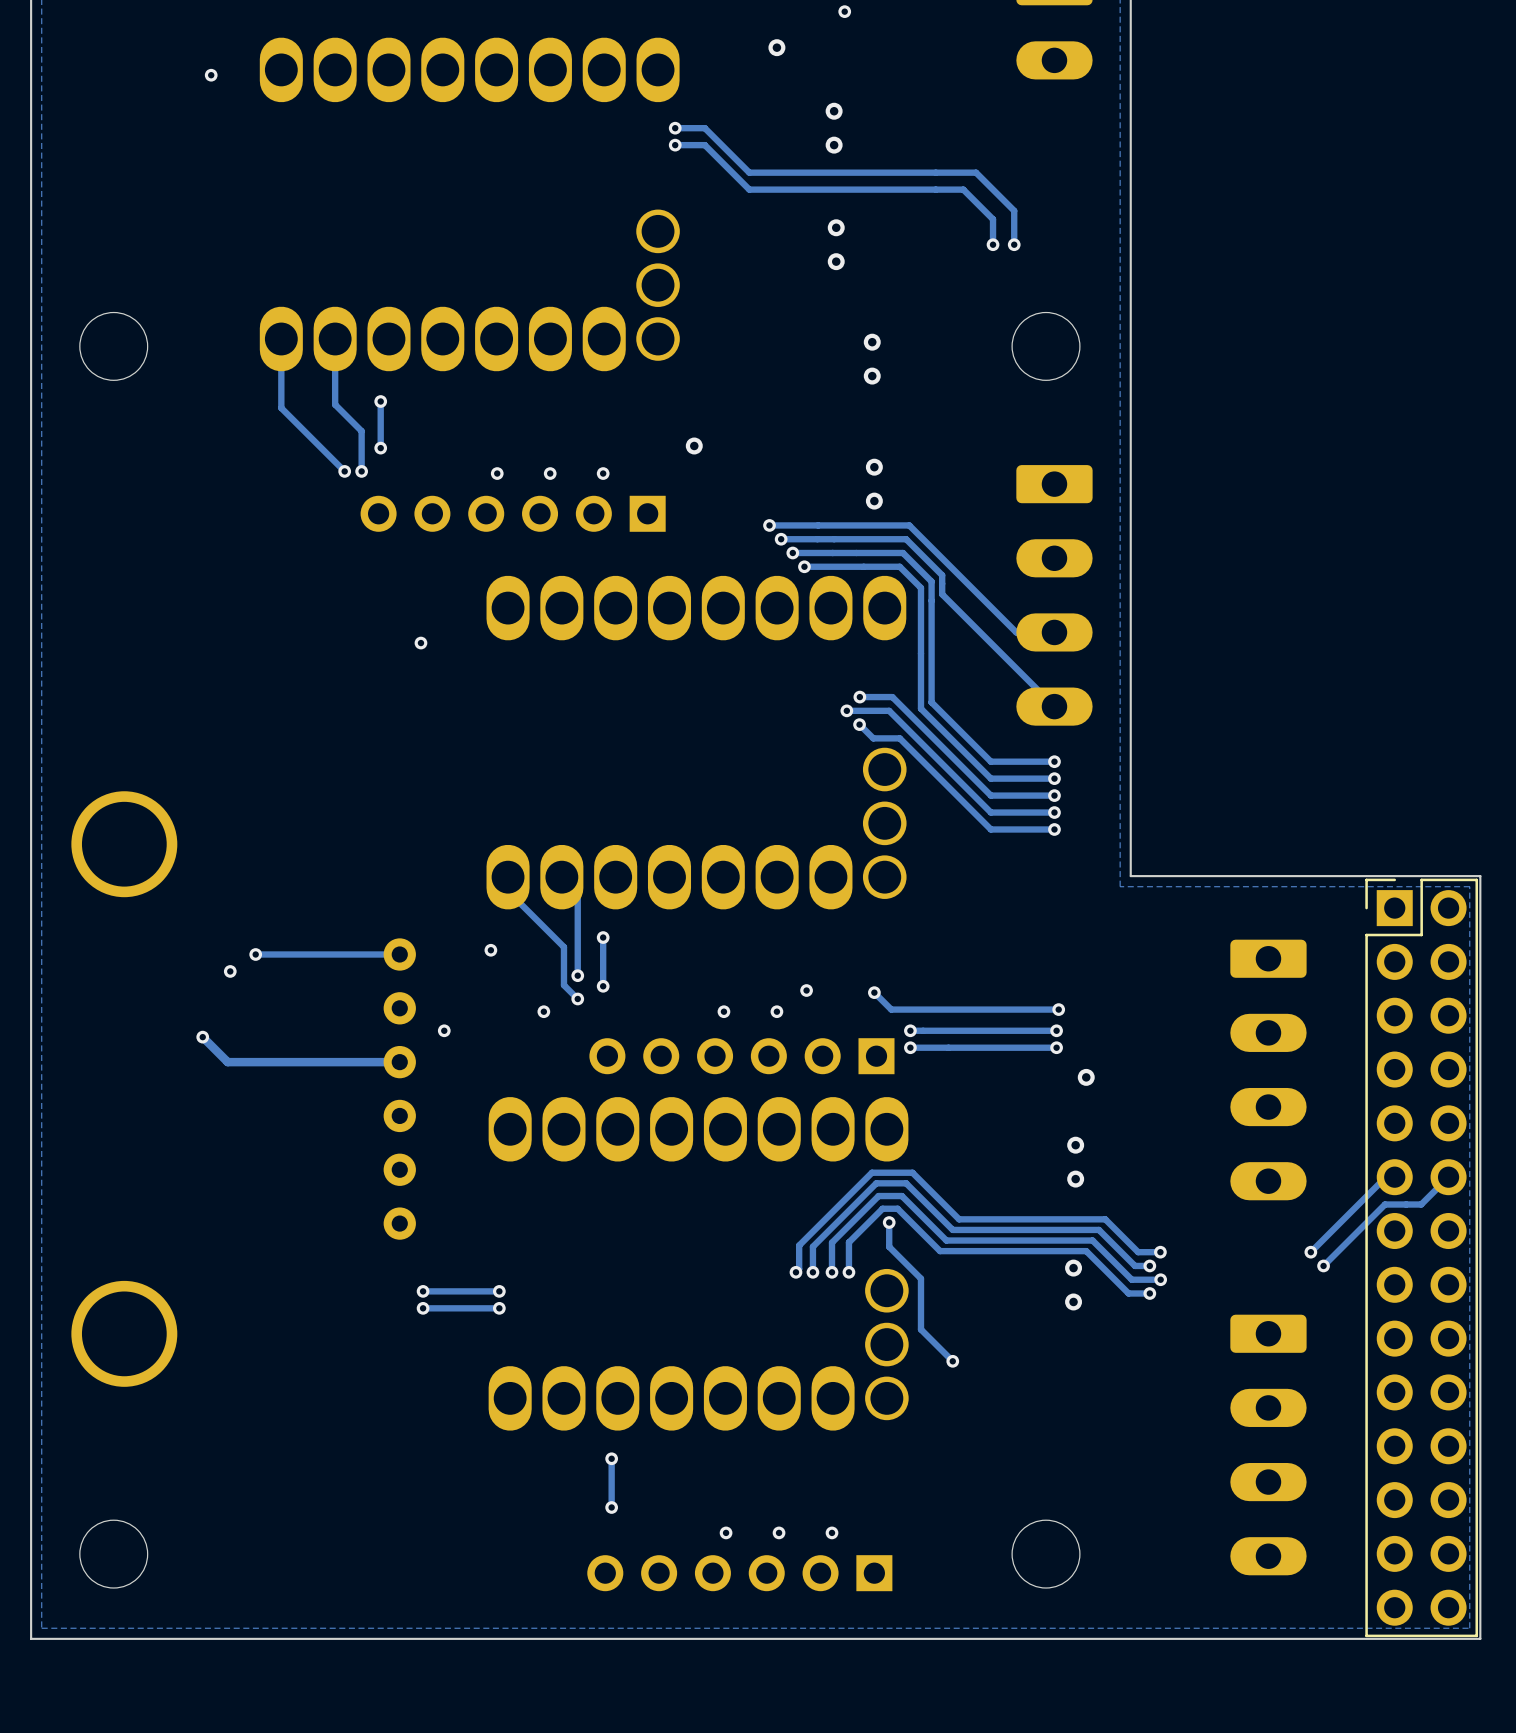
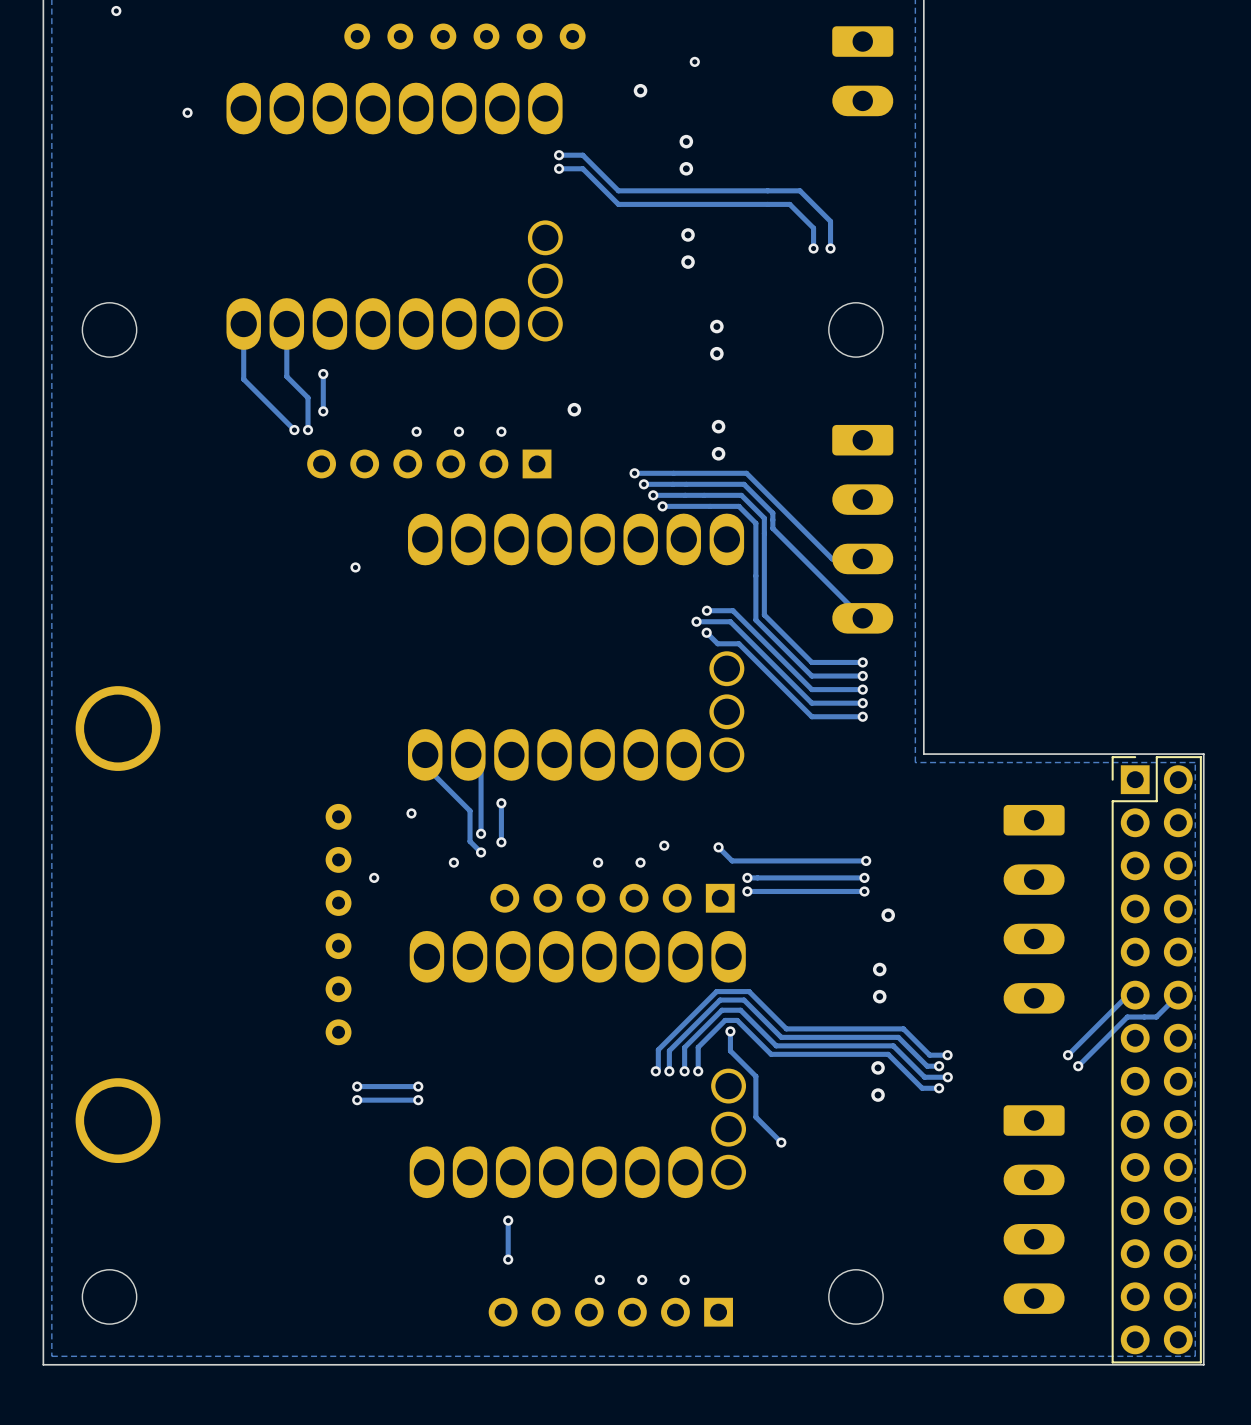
via: (255, 954) -> none
track: (399, 954) (255, 954) -> none
via: (230, 971) -> none
track: (202, 1037) (227, 1062) (399, 1062) -> none
via: (202, 1037) -> none

